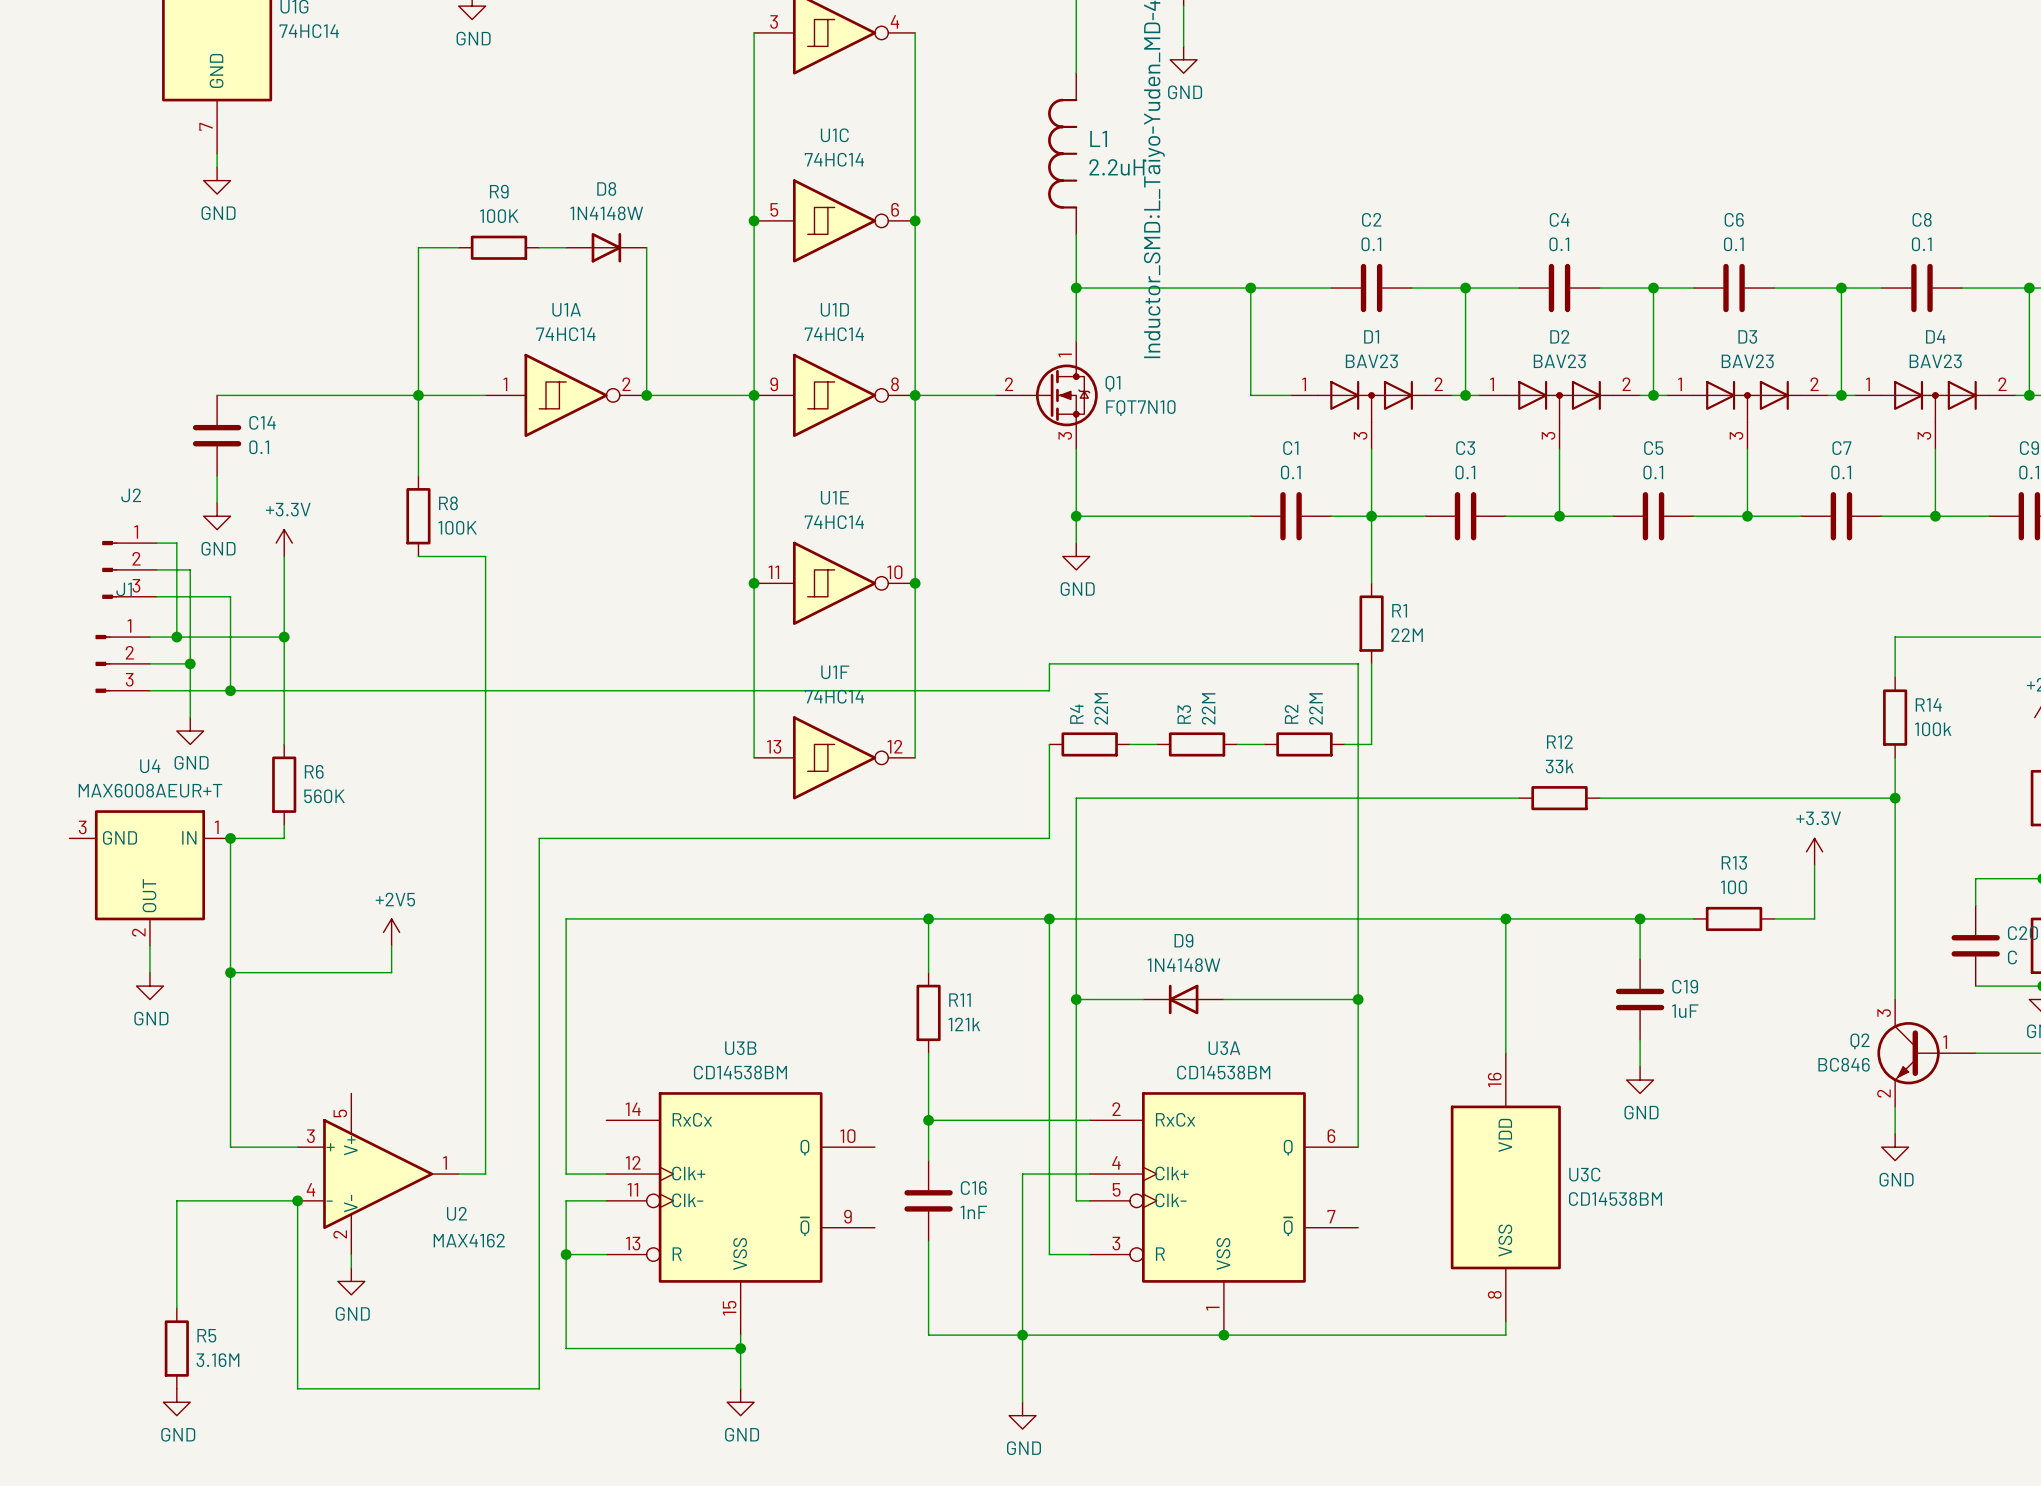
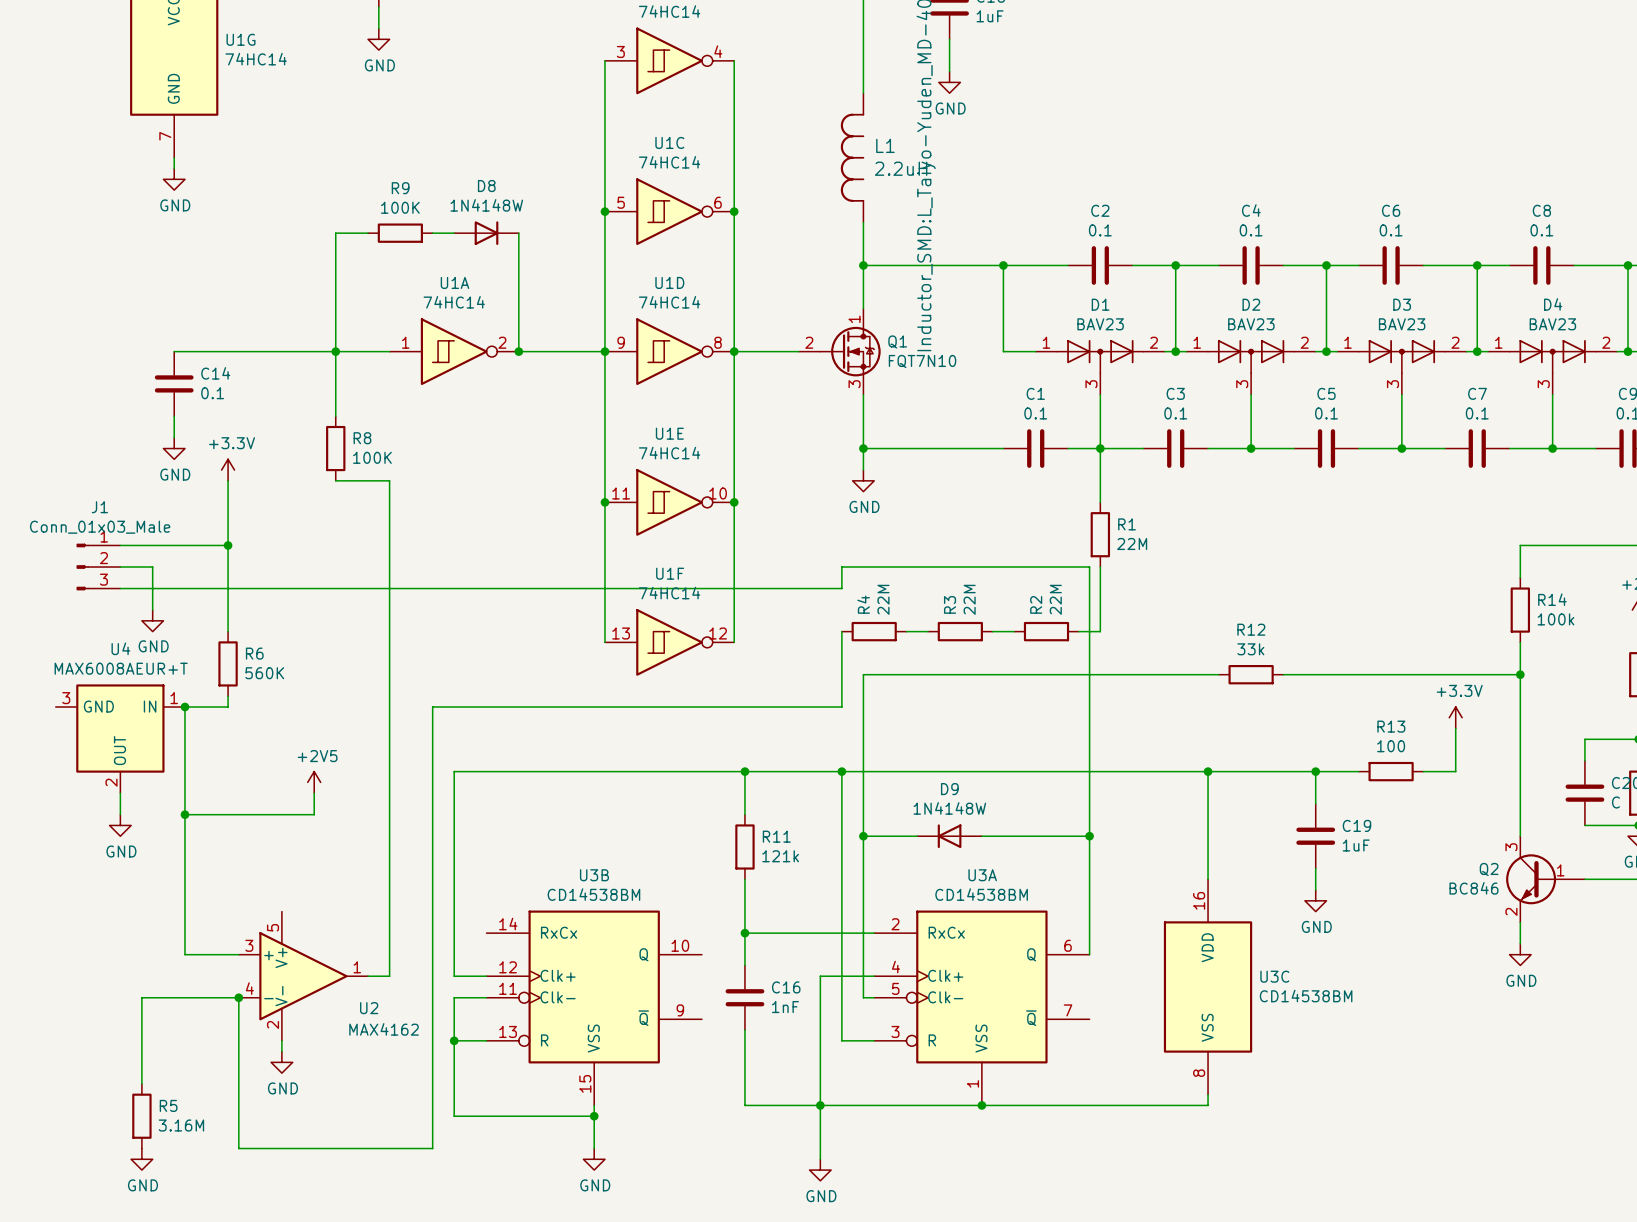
wire: (156, 543) (176, 543) (176, 637) -> none
J2: (129, 569) -> none
wire: (156, 569) (190, 569) (190, 663) -> none
wire: (156, 596) (230, 596) (230, 690) -> none
J1 value: none -> Conn_01x03_Male (100, 527)
junction: (176, 637) -> none
junction: (190, 663) -> none
junction: (230, 690) -> none

